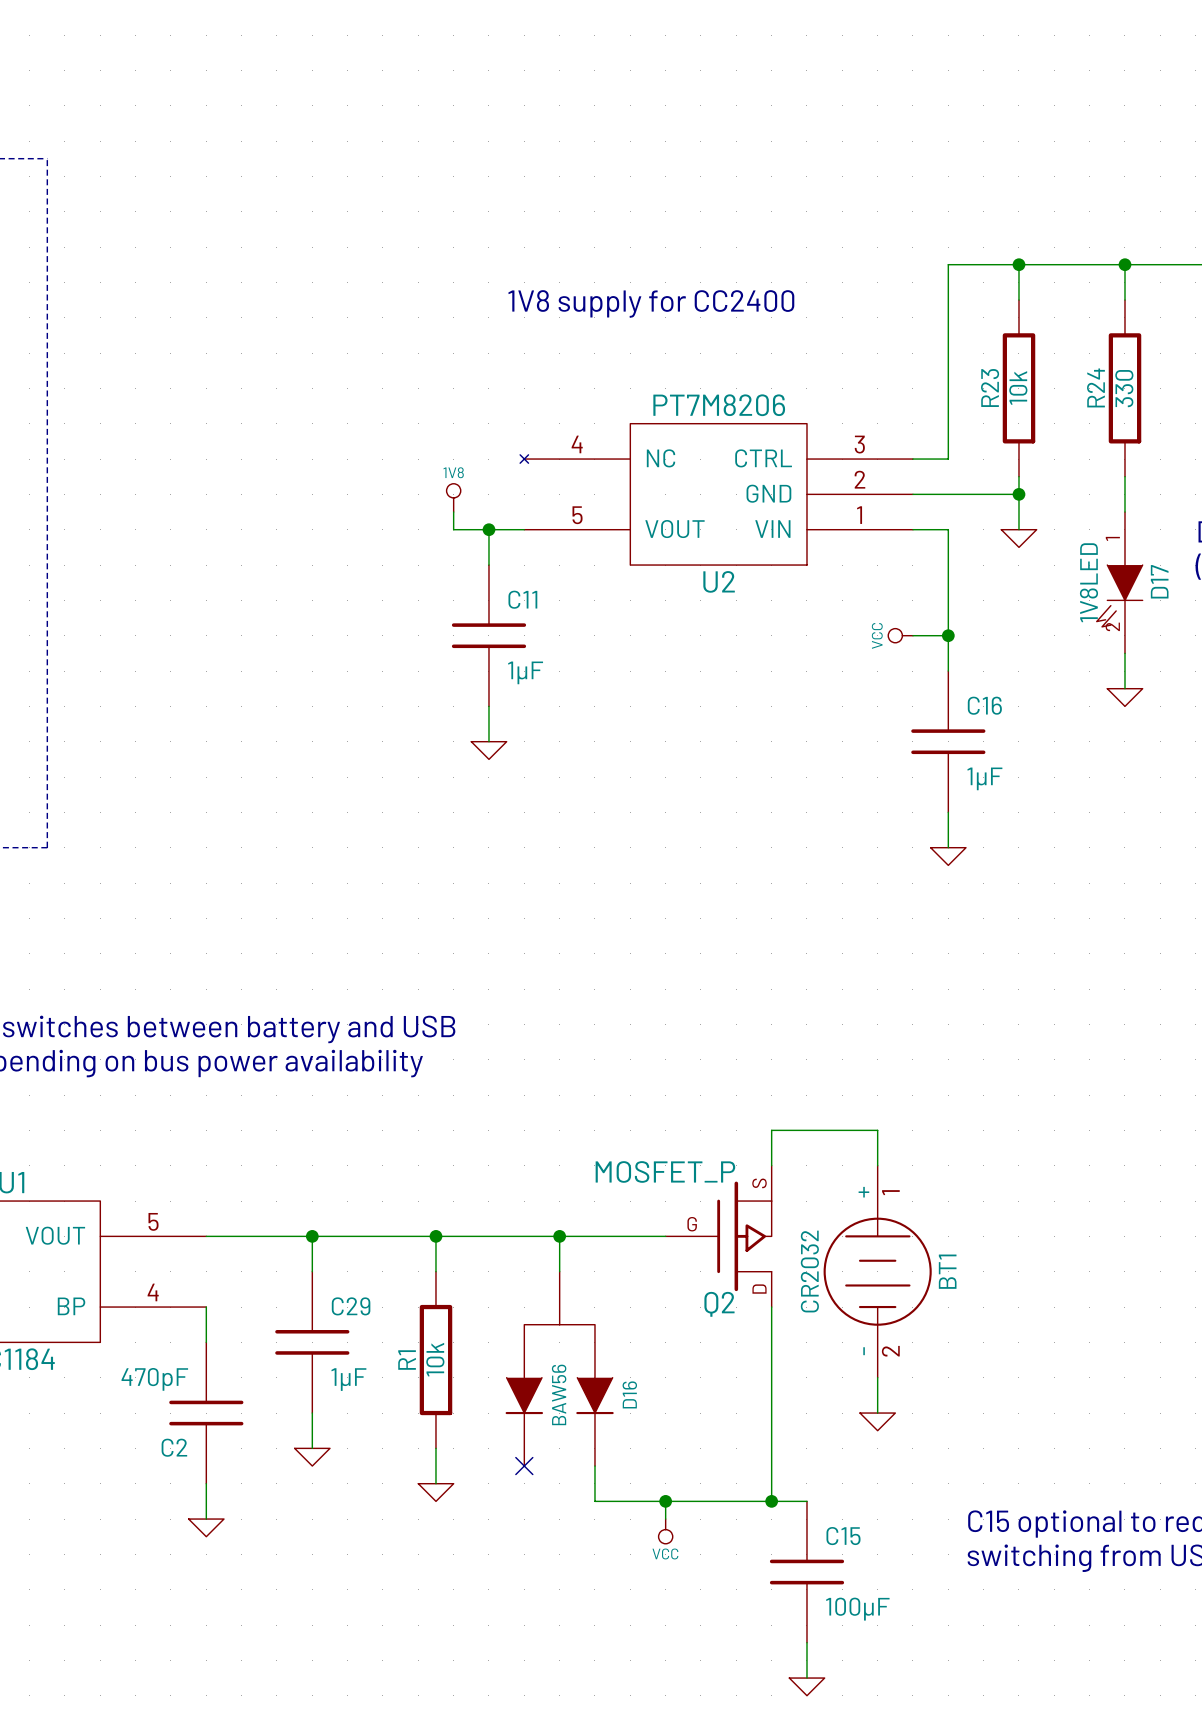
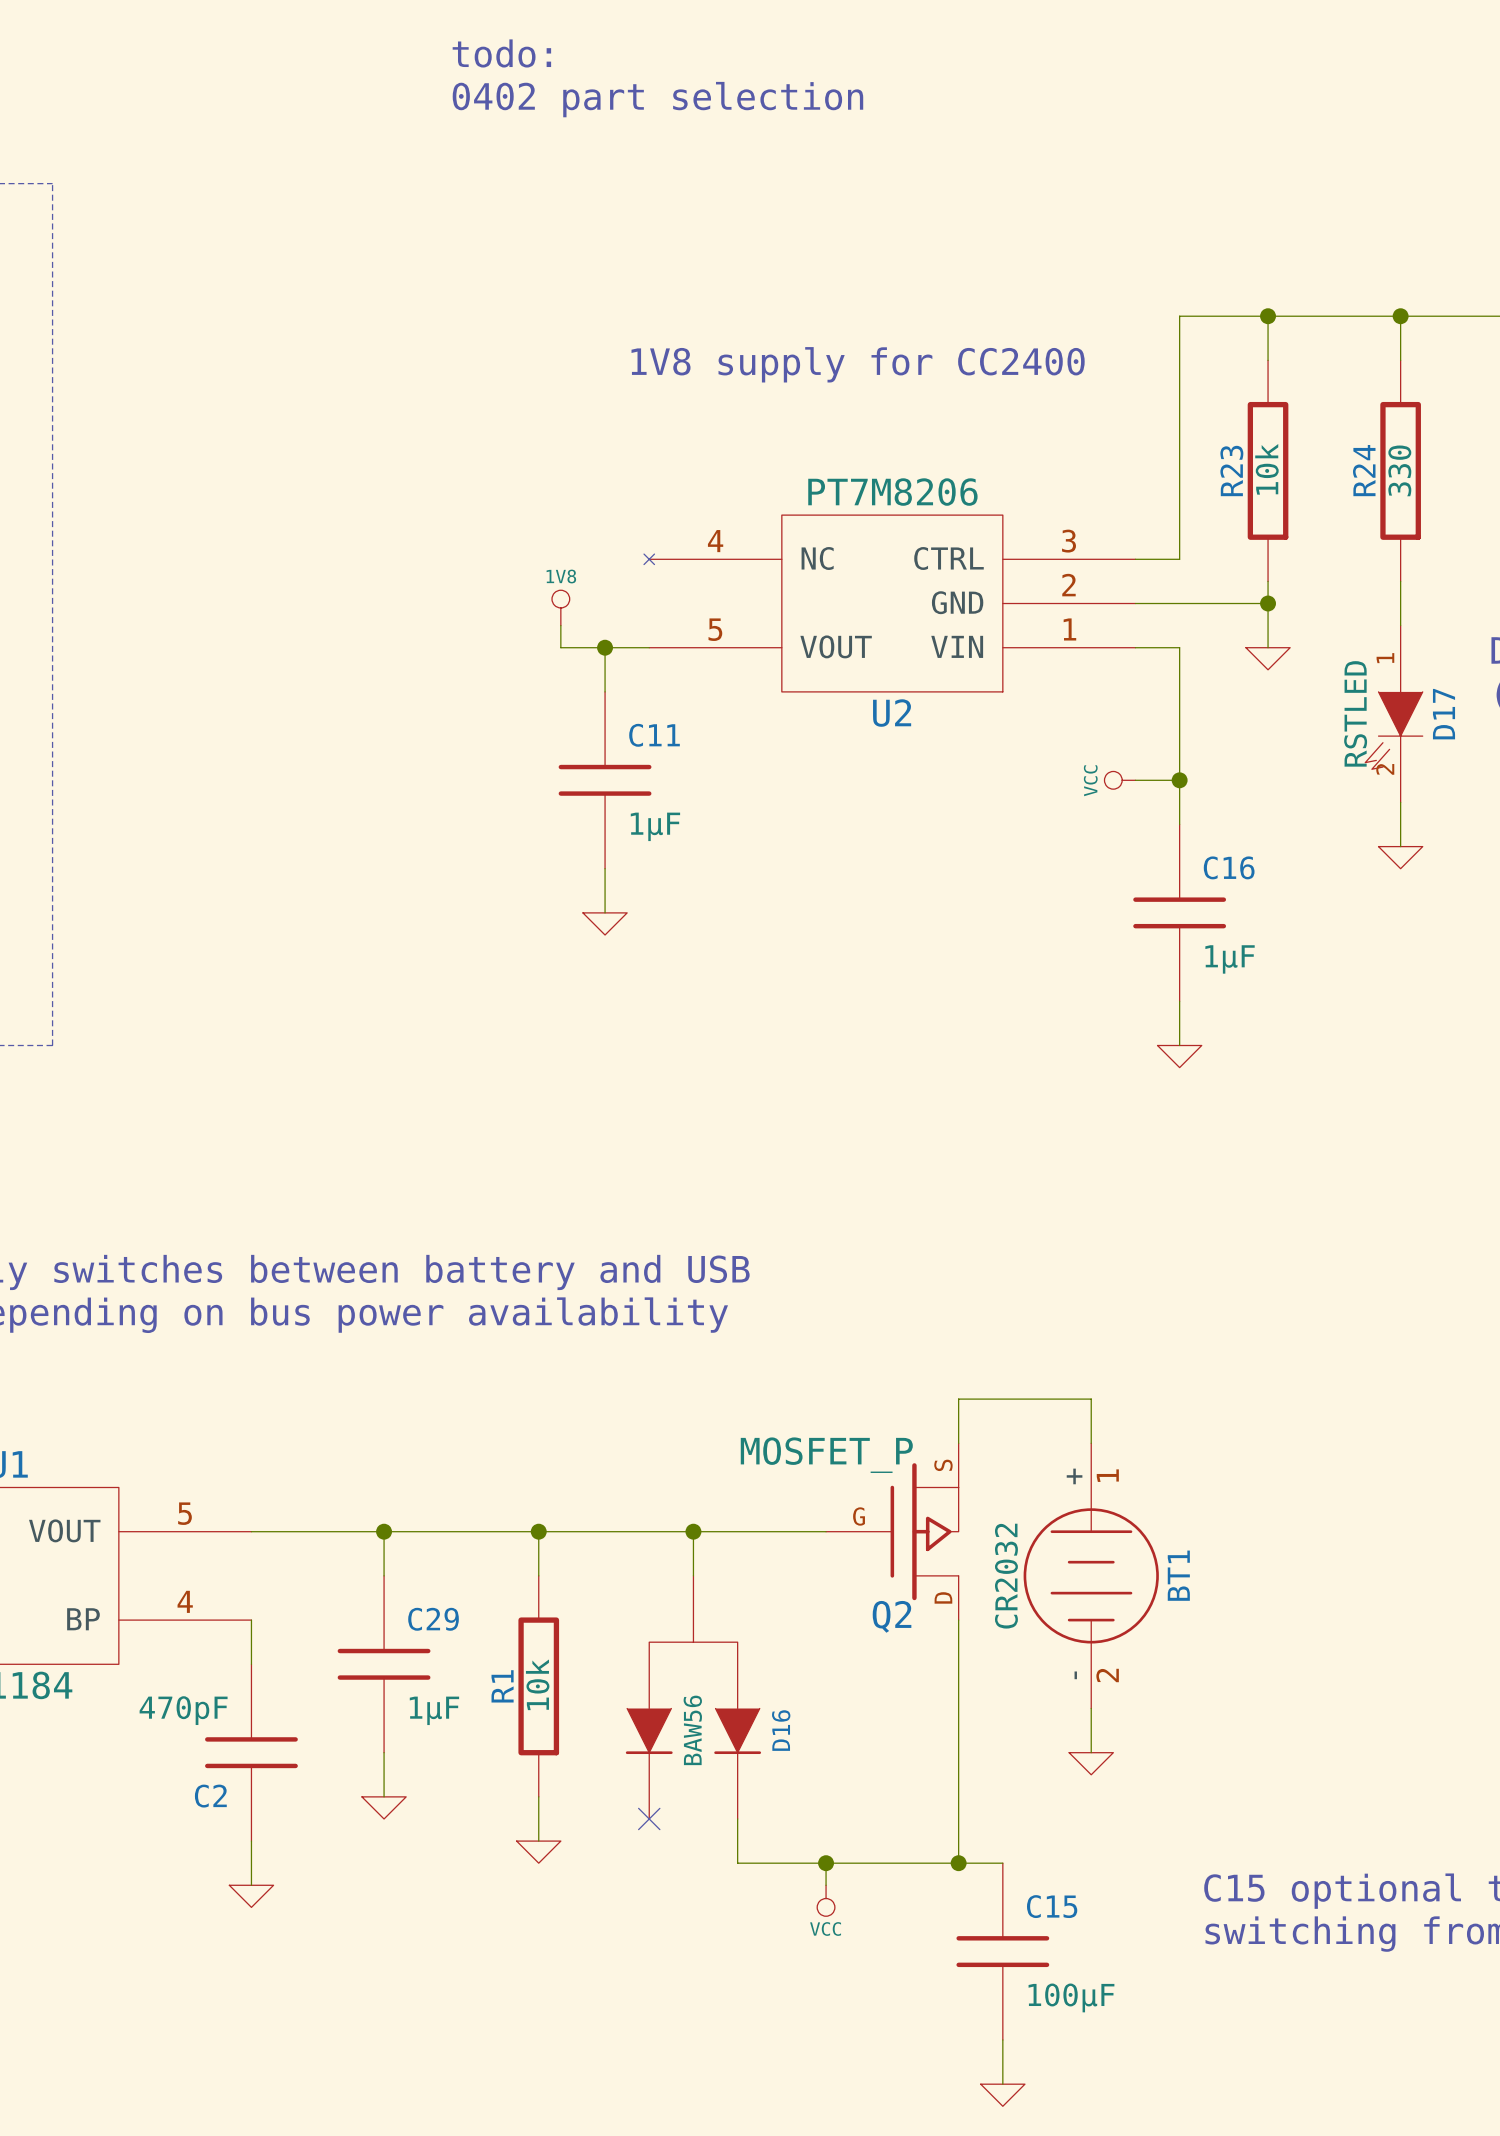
text: none -> todo: (501, 53)
text: none -> 0402 part selection (657, 99)
D17 value: 1V8LED (1088, 582) -> RSTLED (1355, 713)

